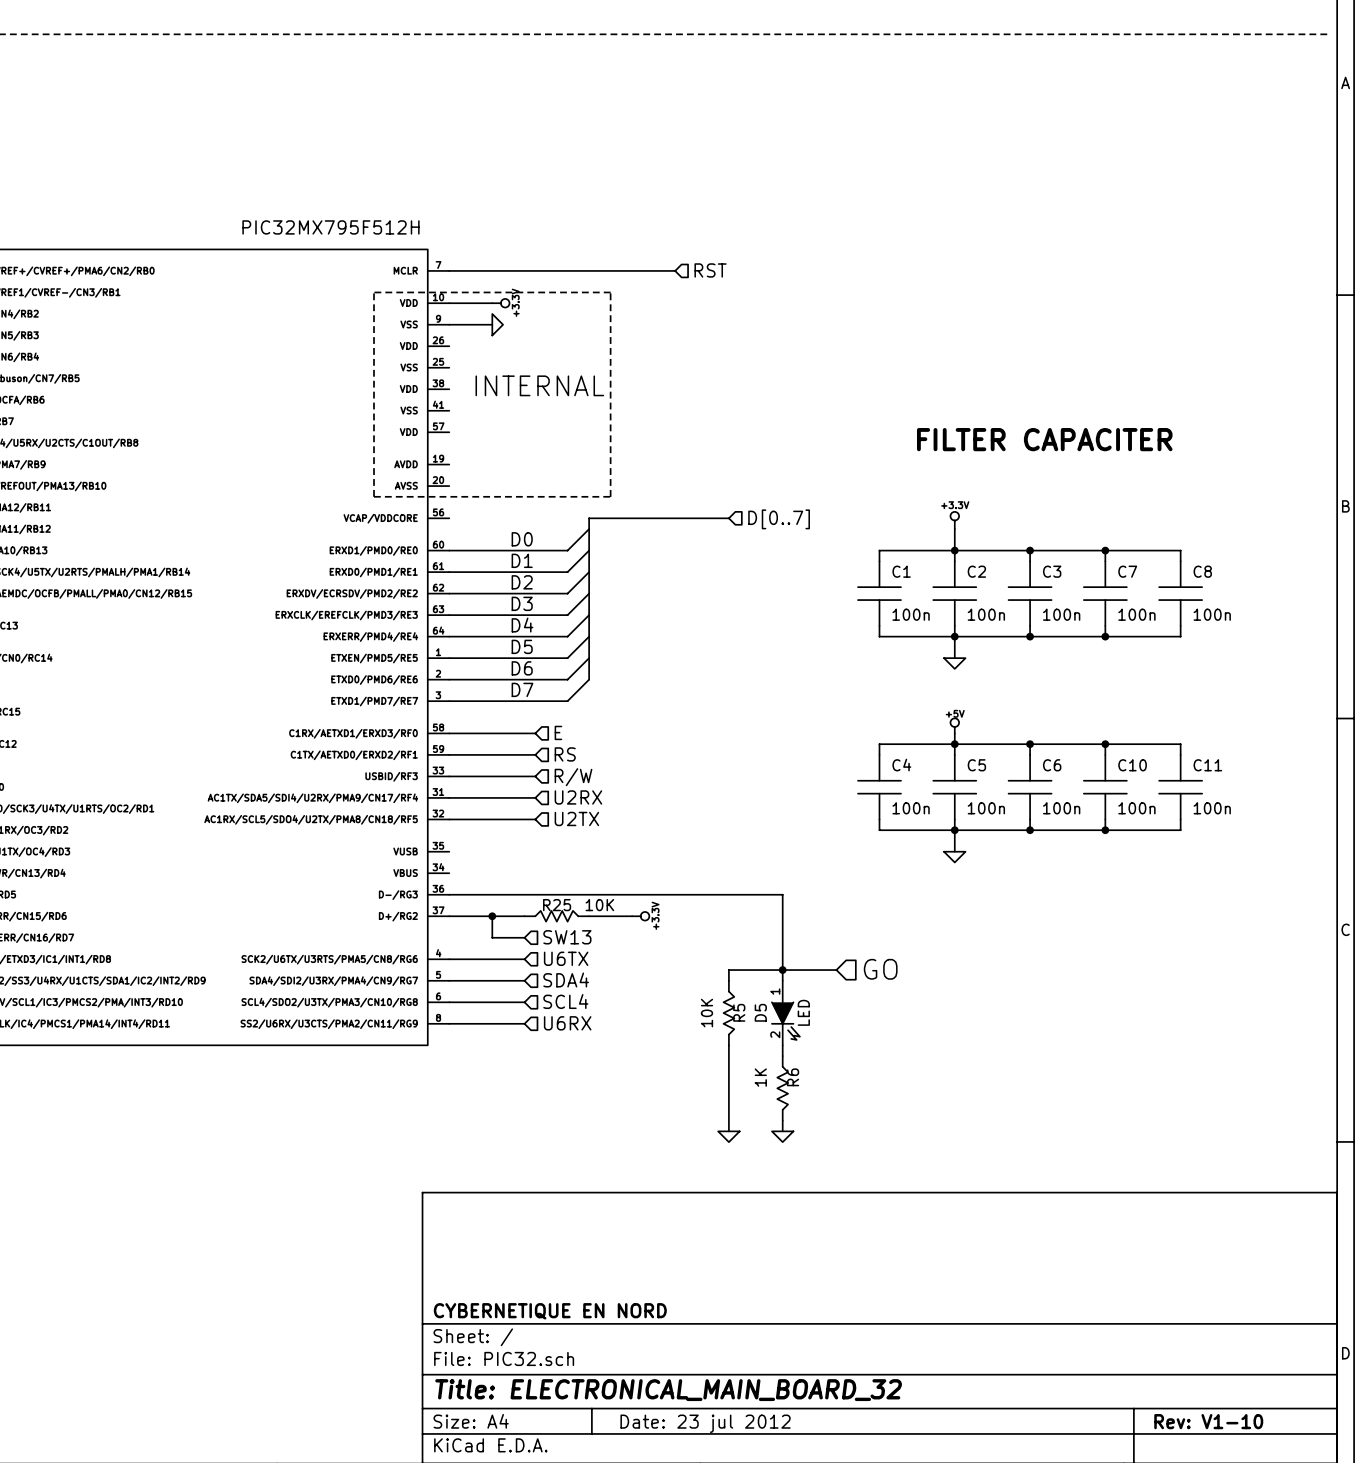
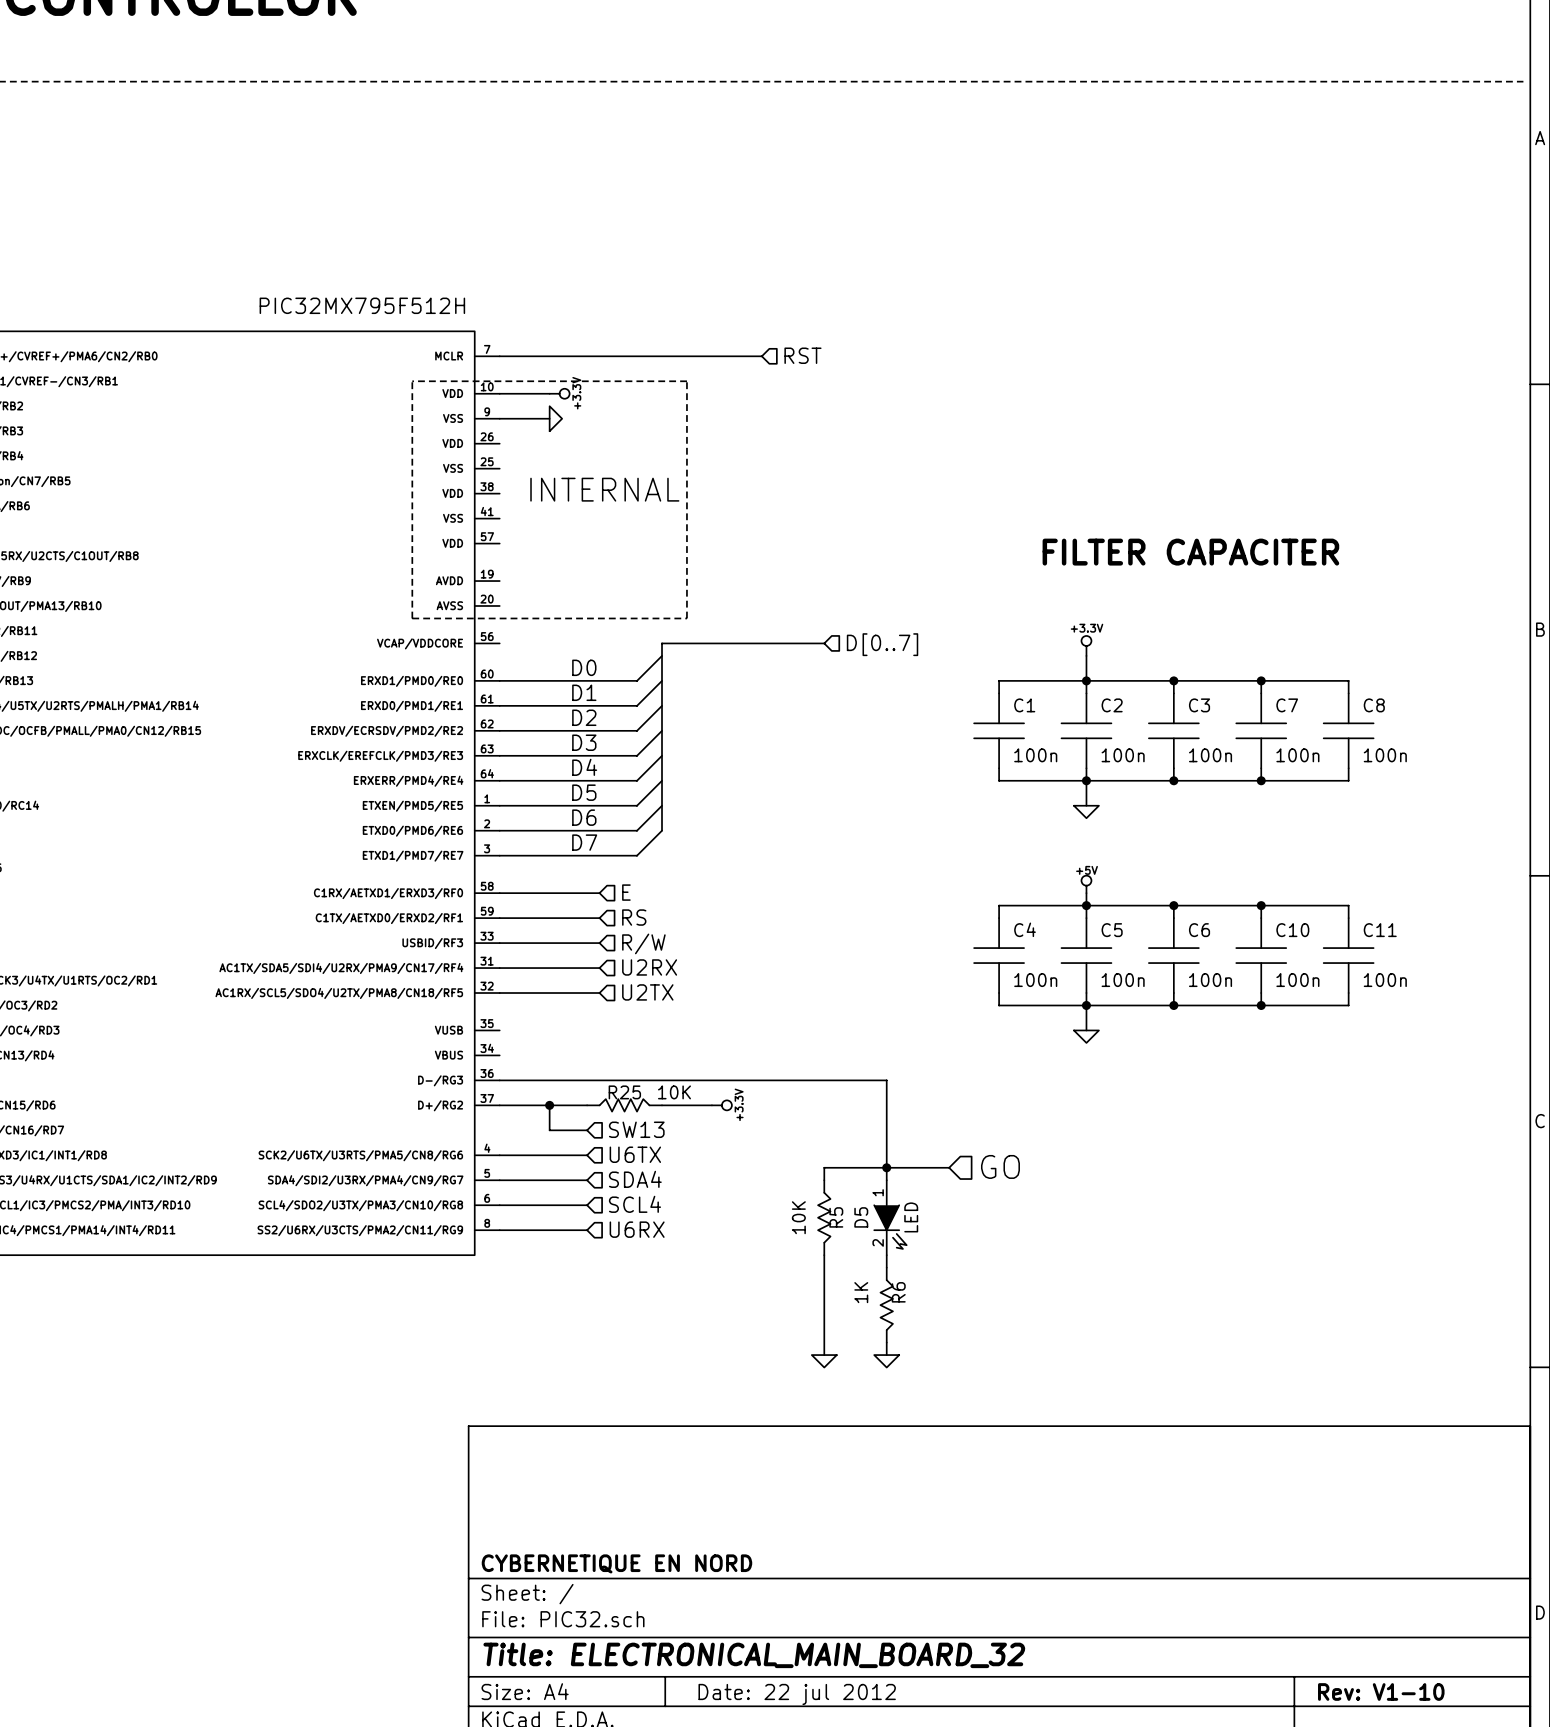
title block: Date: 23 jul 2012 (705, 1423) -> Date: 22 jul 2012 (797, 1694)

